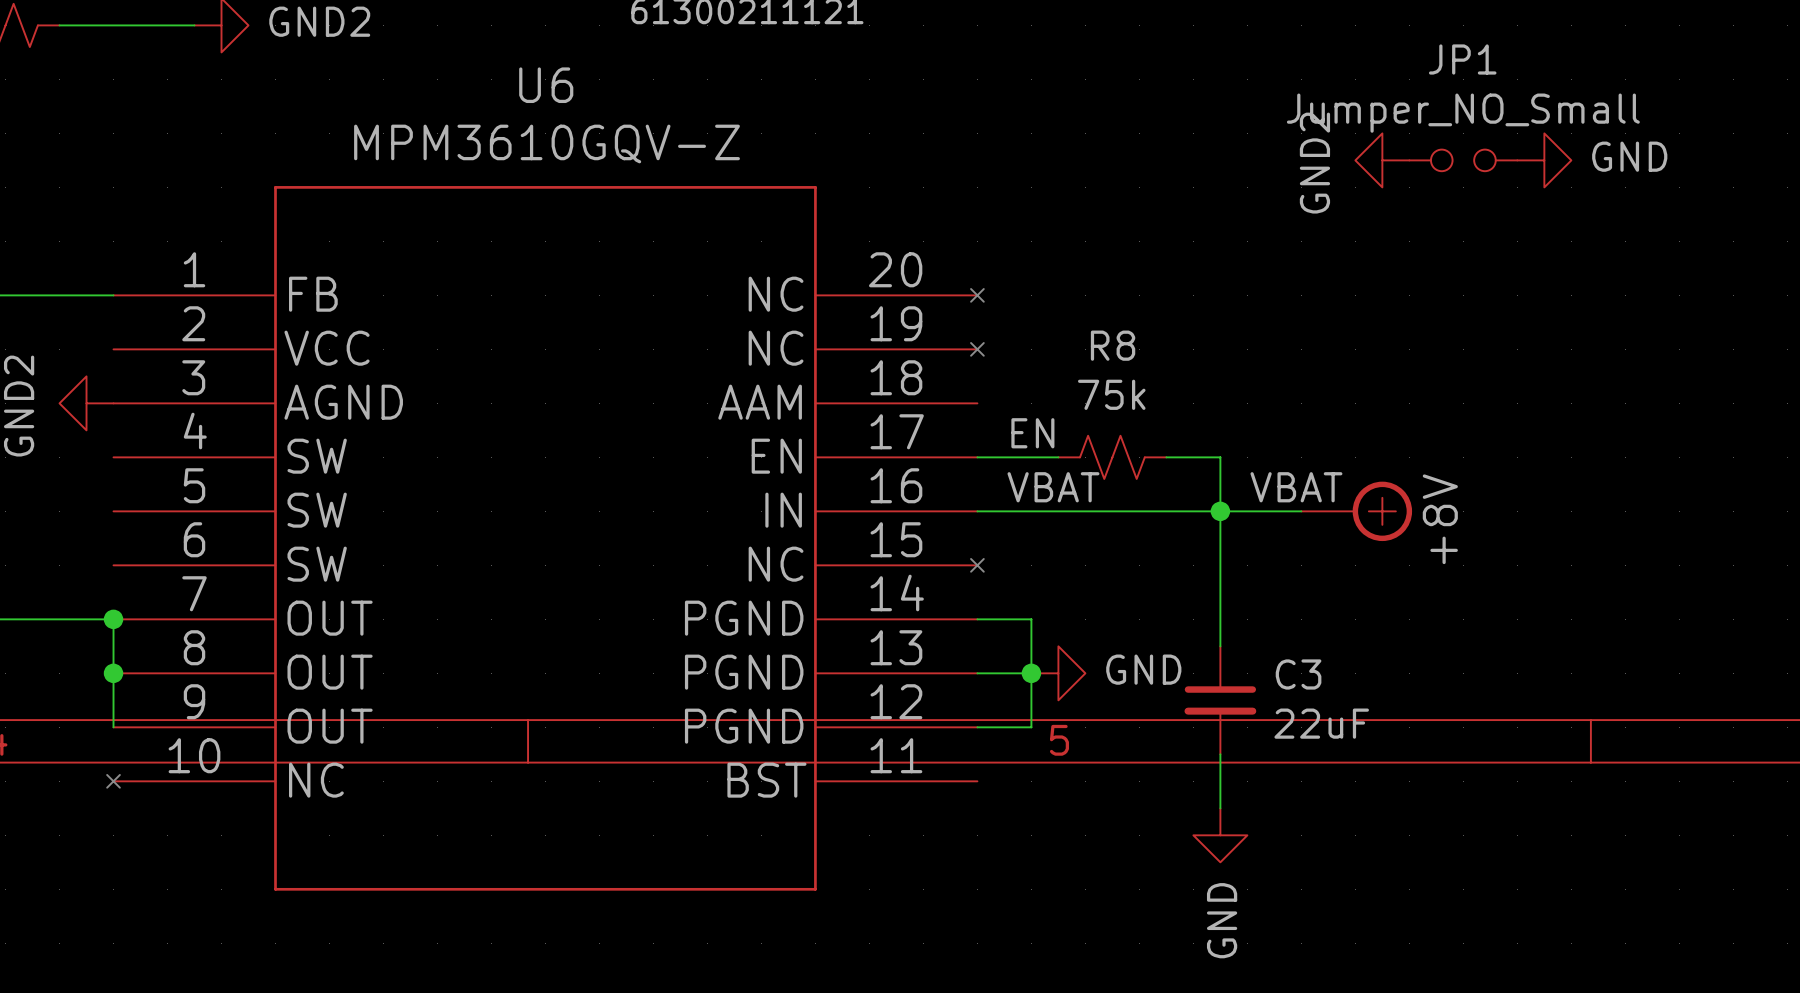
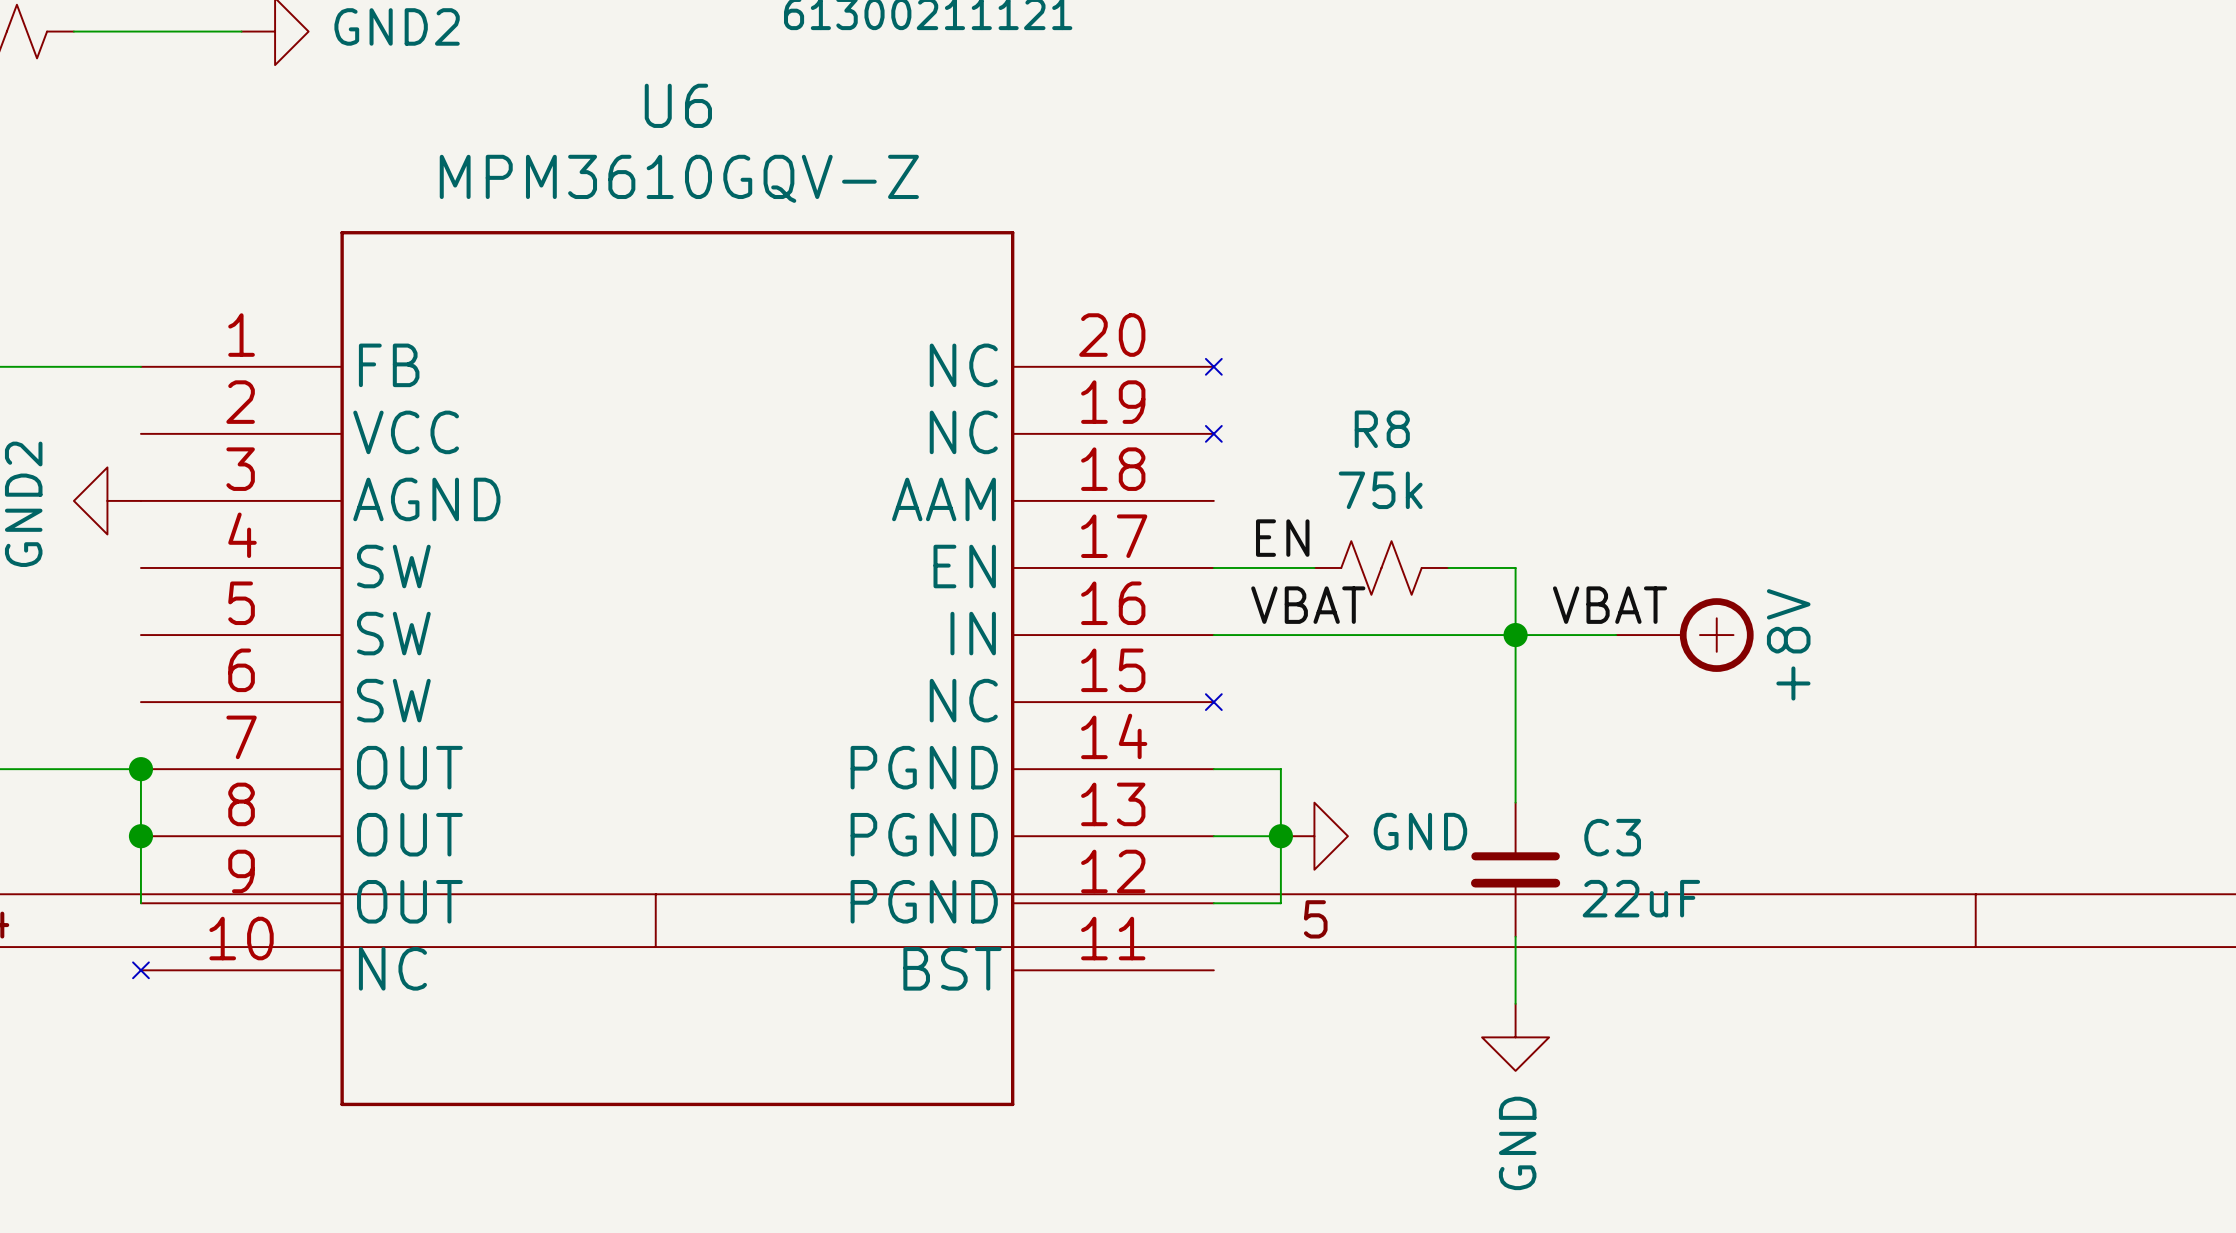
power symbol: GND2 (1382, 160) -> none
JP1: Jumper_NO_Small (1463, 160) -> none
power symbol: GND (1544, 160) -> none

